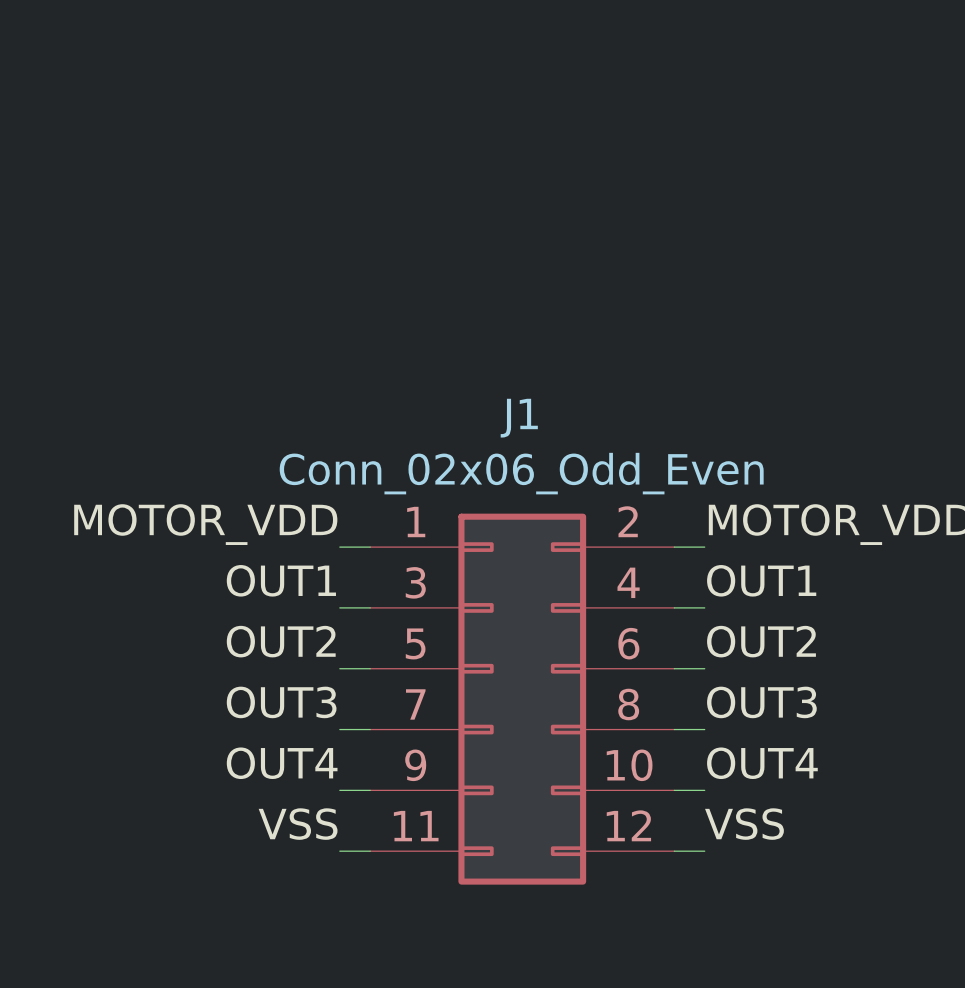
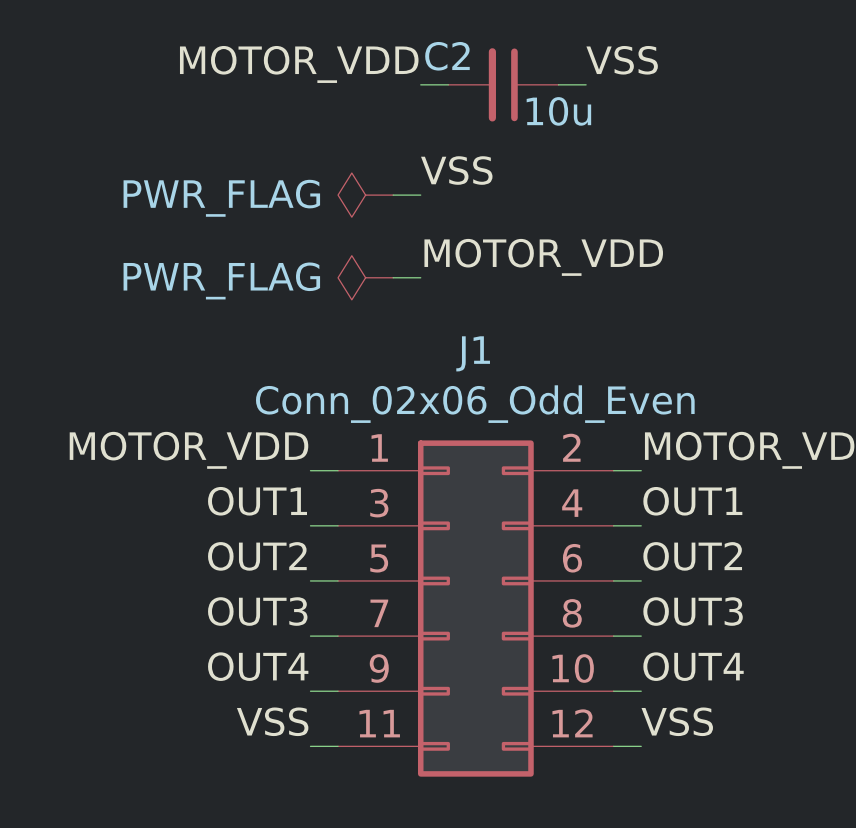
label: none -> VSS (622, 60)
label: none -> MOTOR_VDD (299, 64)
wire: none -> (420, 84) (448, 84)
C2: none -> 10u (503, 84)
wire: none -> (558, 84) (586, 84)
label: none -> VSS (456, 170)
power symbol: none -> PWR_FLAG (365, 195)
wire: none -> (393, 195) (420, 195)
label: none -> MOTOR_VDD (543, 257)
power symbol: none -> PWR_FLAG (365, 277)
wire: none -> (393, 277) (420, 277)

